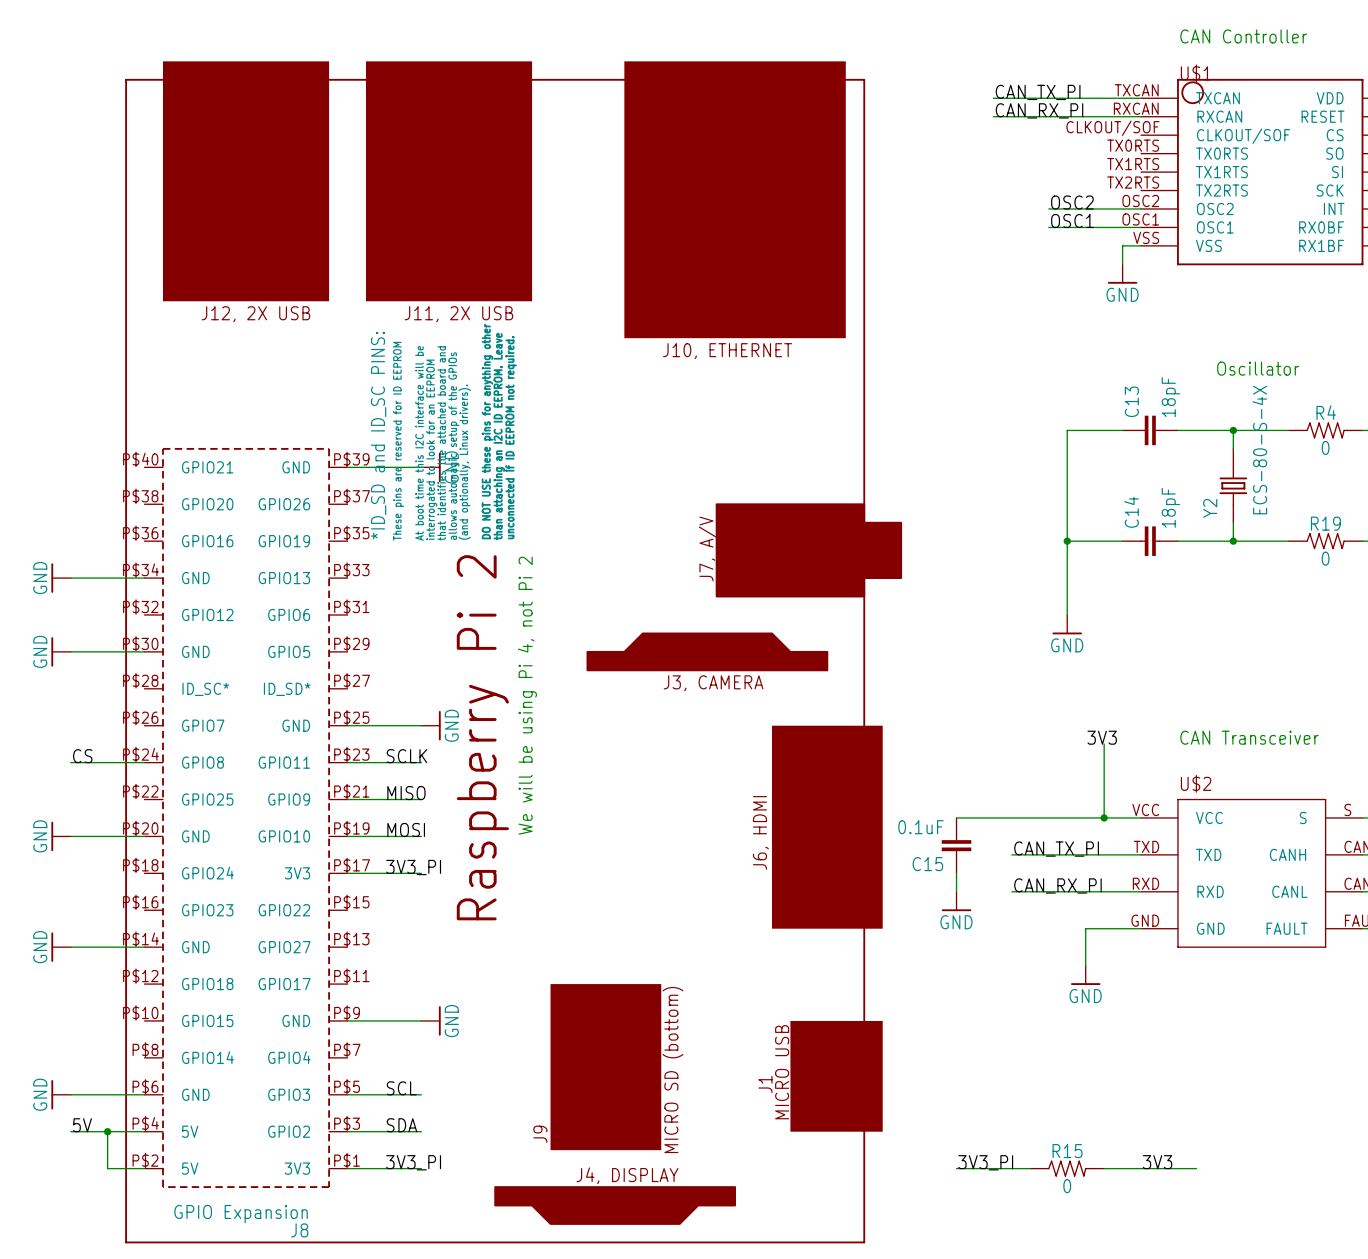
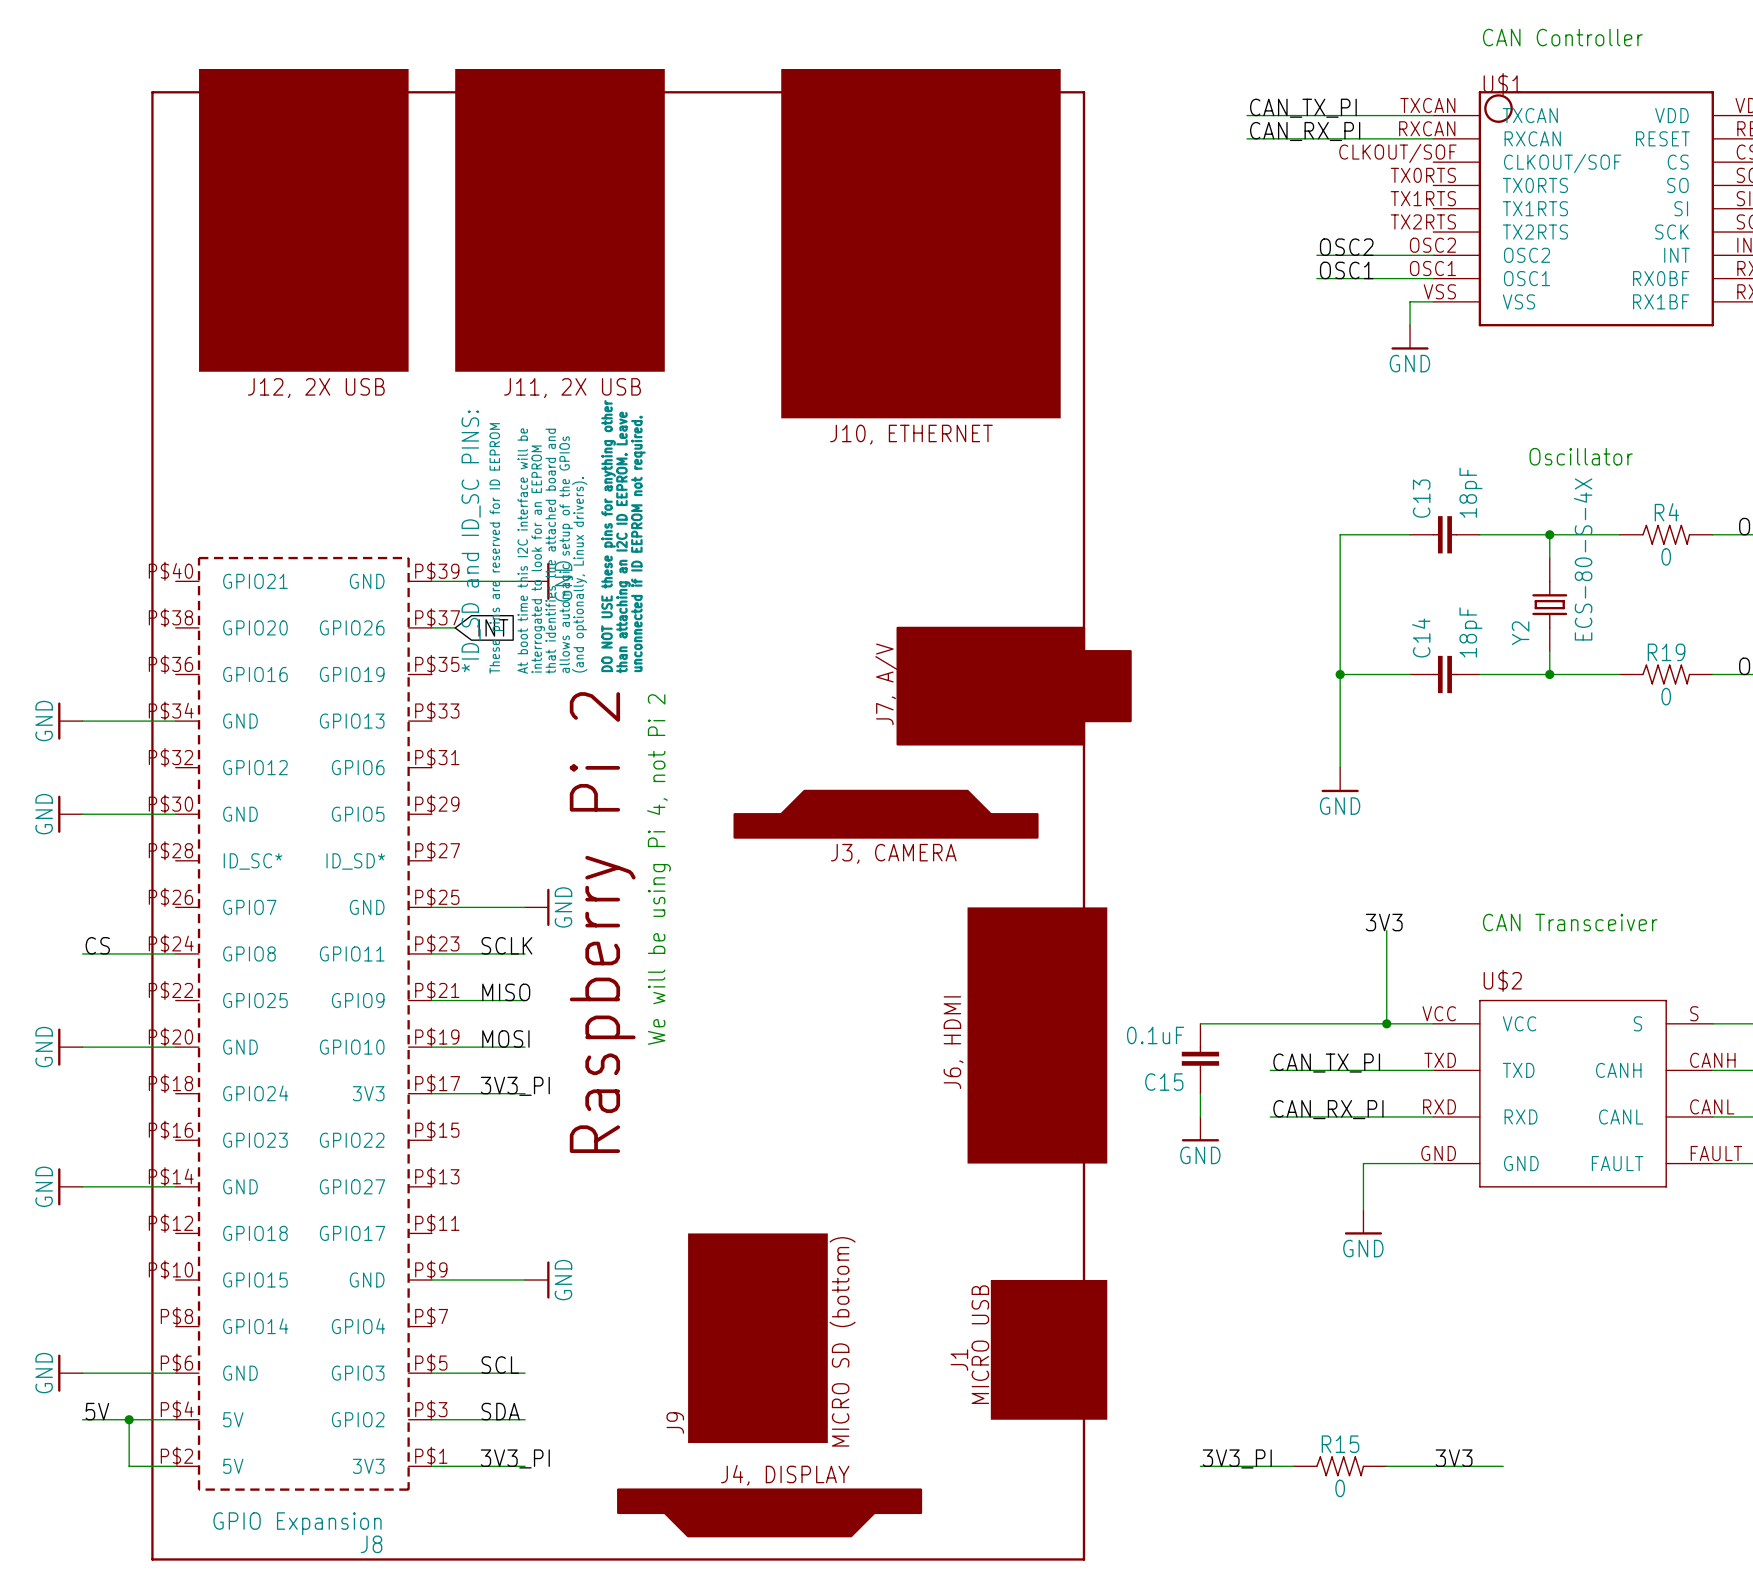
wire: none -> (431, 627) (455, 627)
global label: none -> INT (493, 627)

